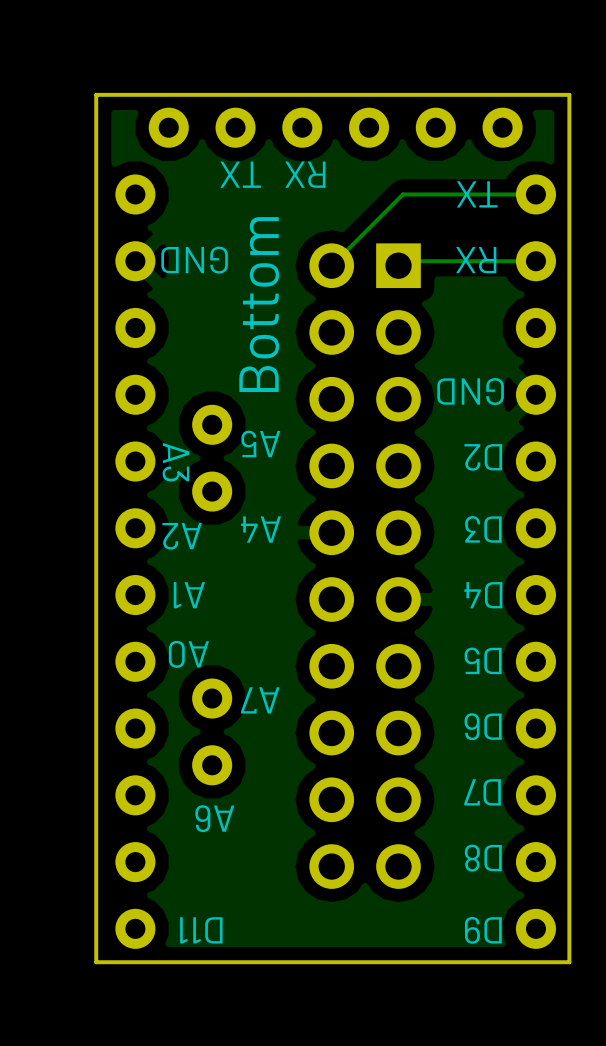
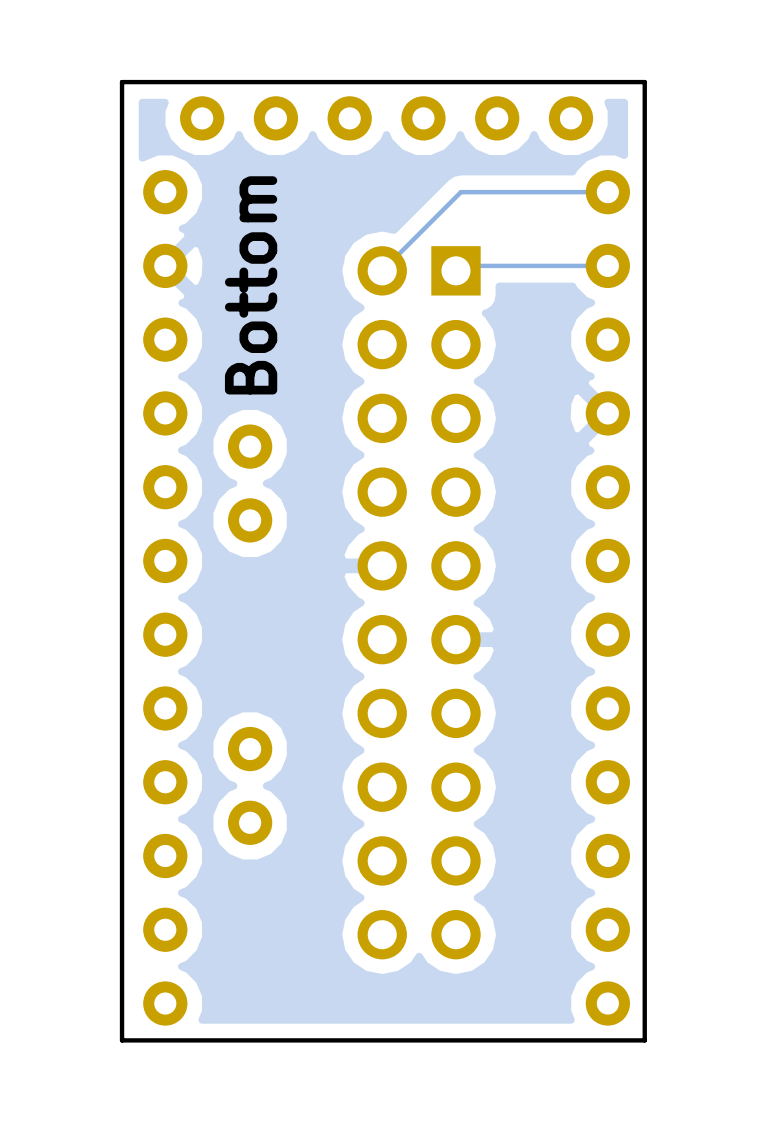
text: TX (240, 174) -> none
text: RX (305, 174) -> none
text: TX (477, 194) -> none
text: GND (194, 260) -> none
text: RX (476, 260) -> none
text position: Bottom (259, 304) -> Bottom (251, 285)
text: GND (470, 391) -> none
text: A5 (260, 443) -> none
text: D2 (483, 457) -> none
text: A3 (175, 462) -> none
text: A4 (261, 529) -> none
text: D3 (483, 529) -> none
text: A2 (182, 536) -> none
text: A1 (189, 595) -> none
text: D4 (483, 595) -> none
text: A0 (188, 654) -> none
text: D5 (483, 660) -> none
text: A7 (260, 700) -> none
text: D6 (483, 726) -> none
text: D7 (482, 792) -> none
text: A6 (214, 818) -> none
text: D8 (483, 858) -> none
text: D11 (201, 930) -> none
text: D9 (483, 930) -> none

